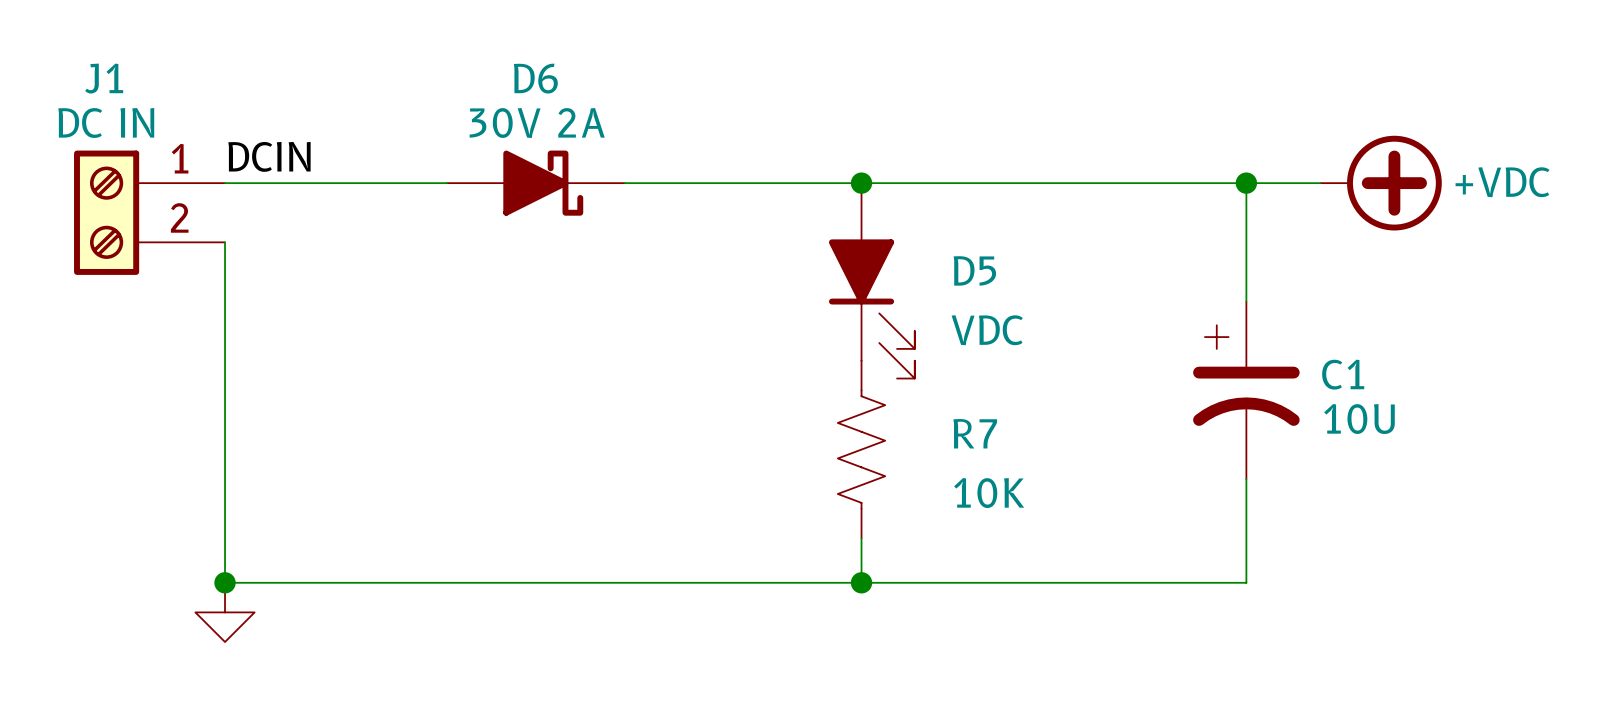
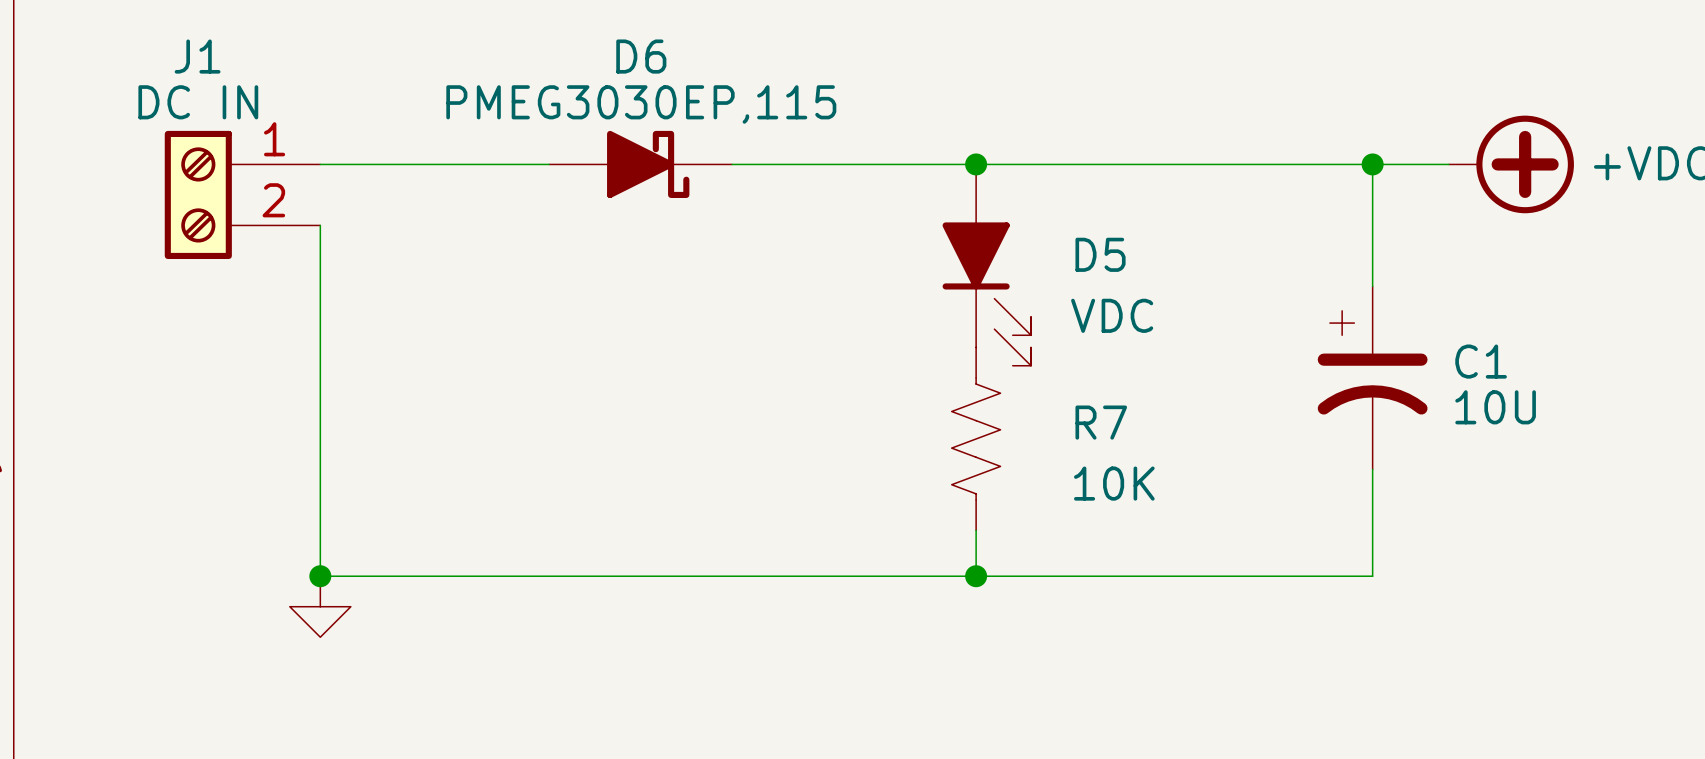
D6 value: 30V 2A (537, 123) -> PMEG3030EP,115 (641, 104)
label: DCIN (269, 156) -> none

